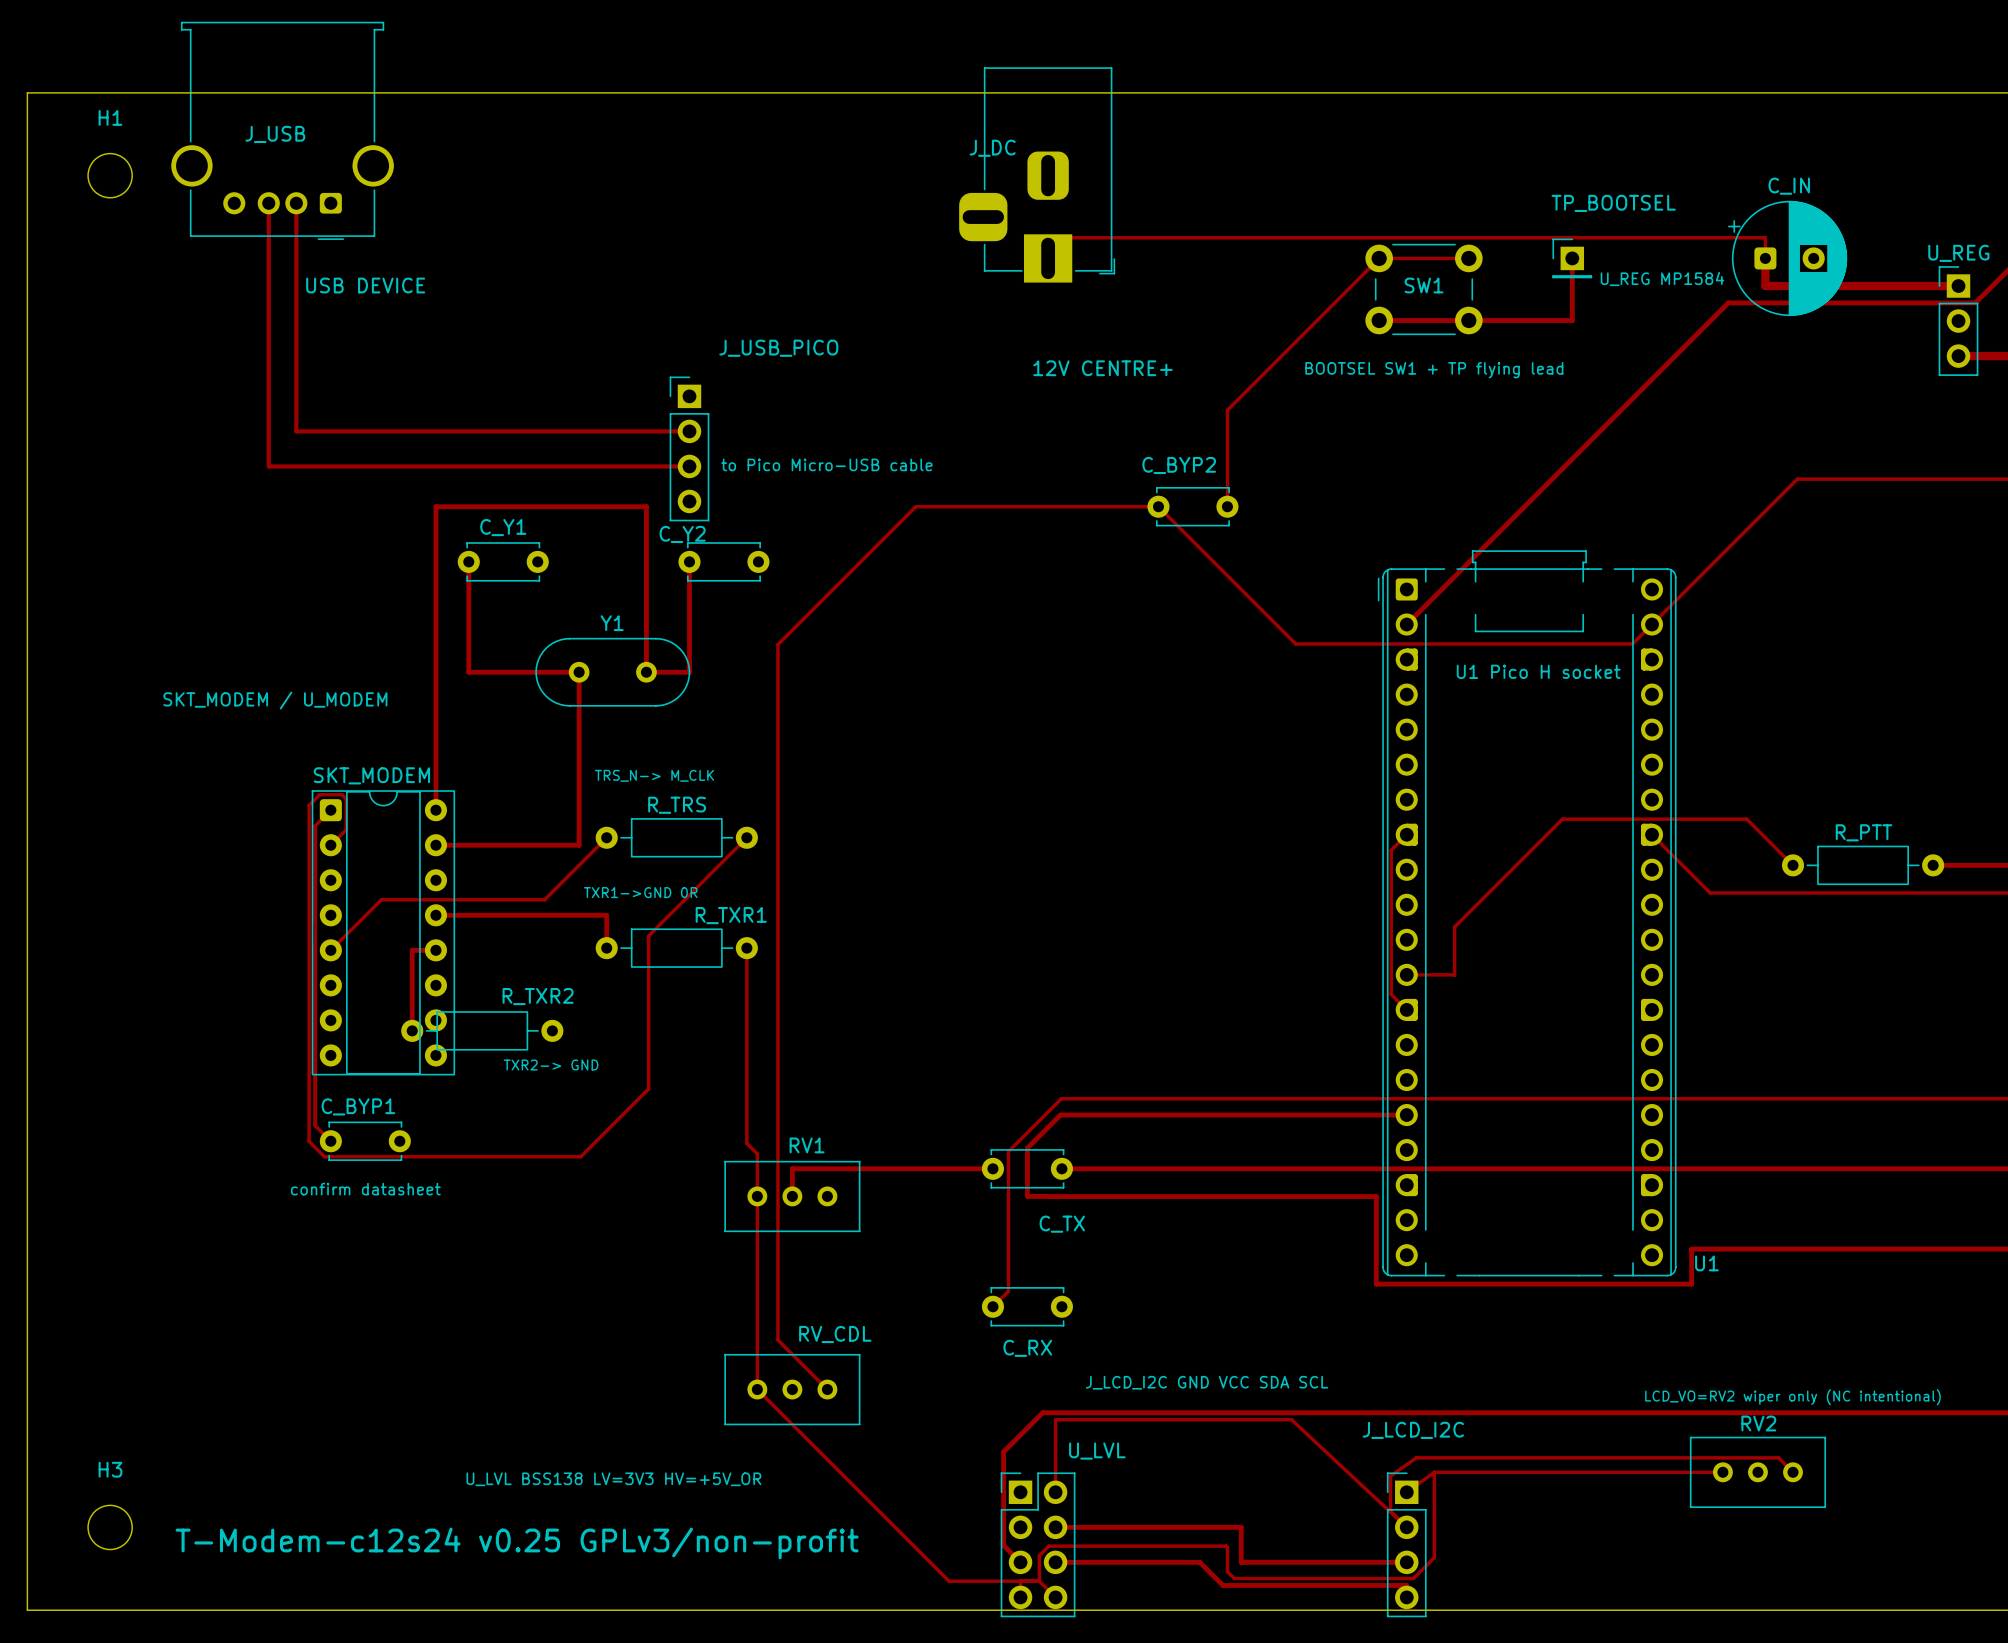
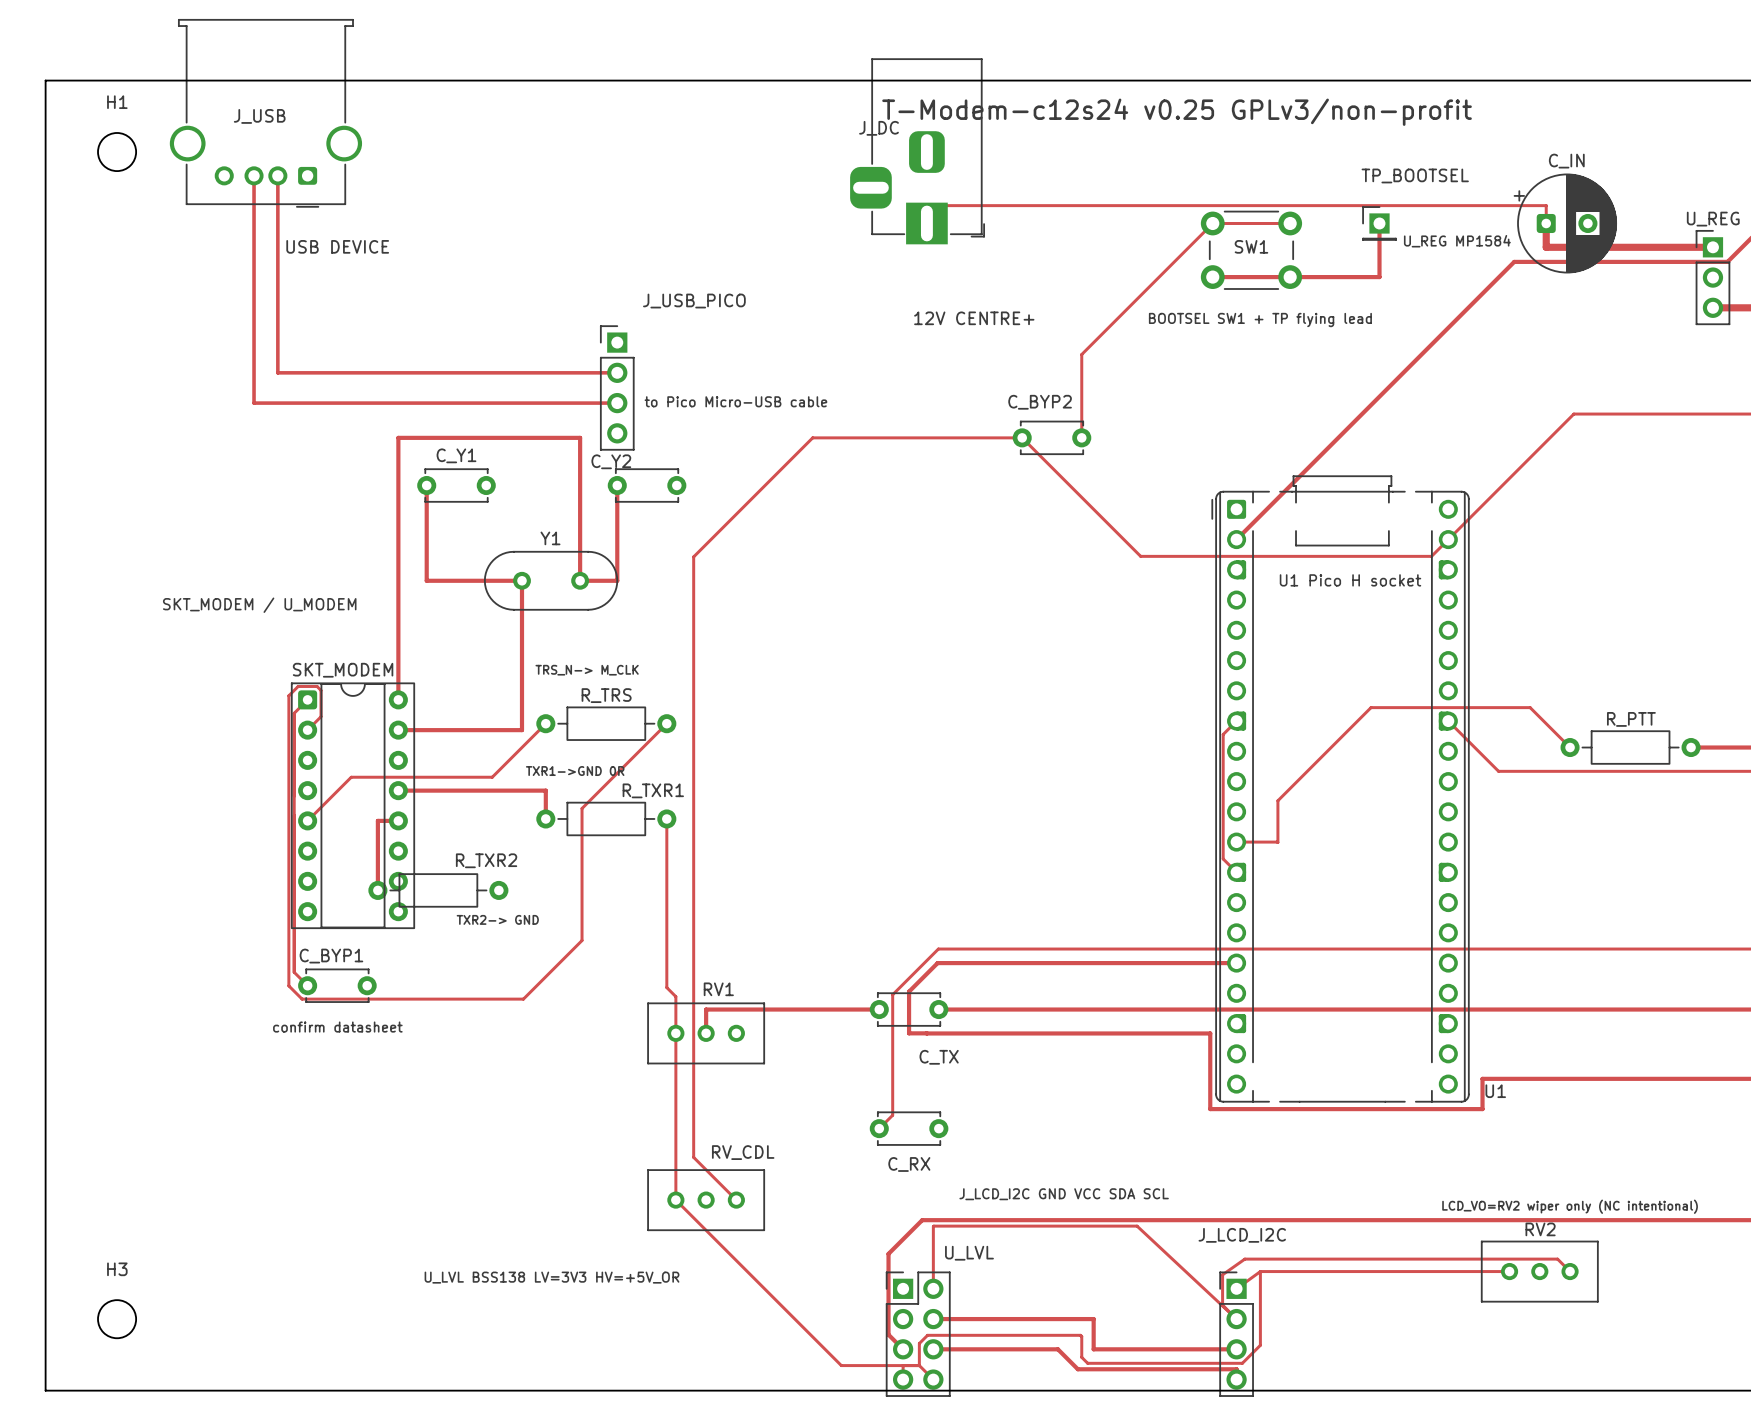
text: none -> T-Modem-c12s24 v0.25 GPLv3/non-profit (1177, 112)
text: T-Modem-c12s24 v0.25 GPLv3/non-profit (517, 1543) -> none

